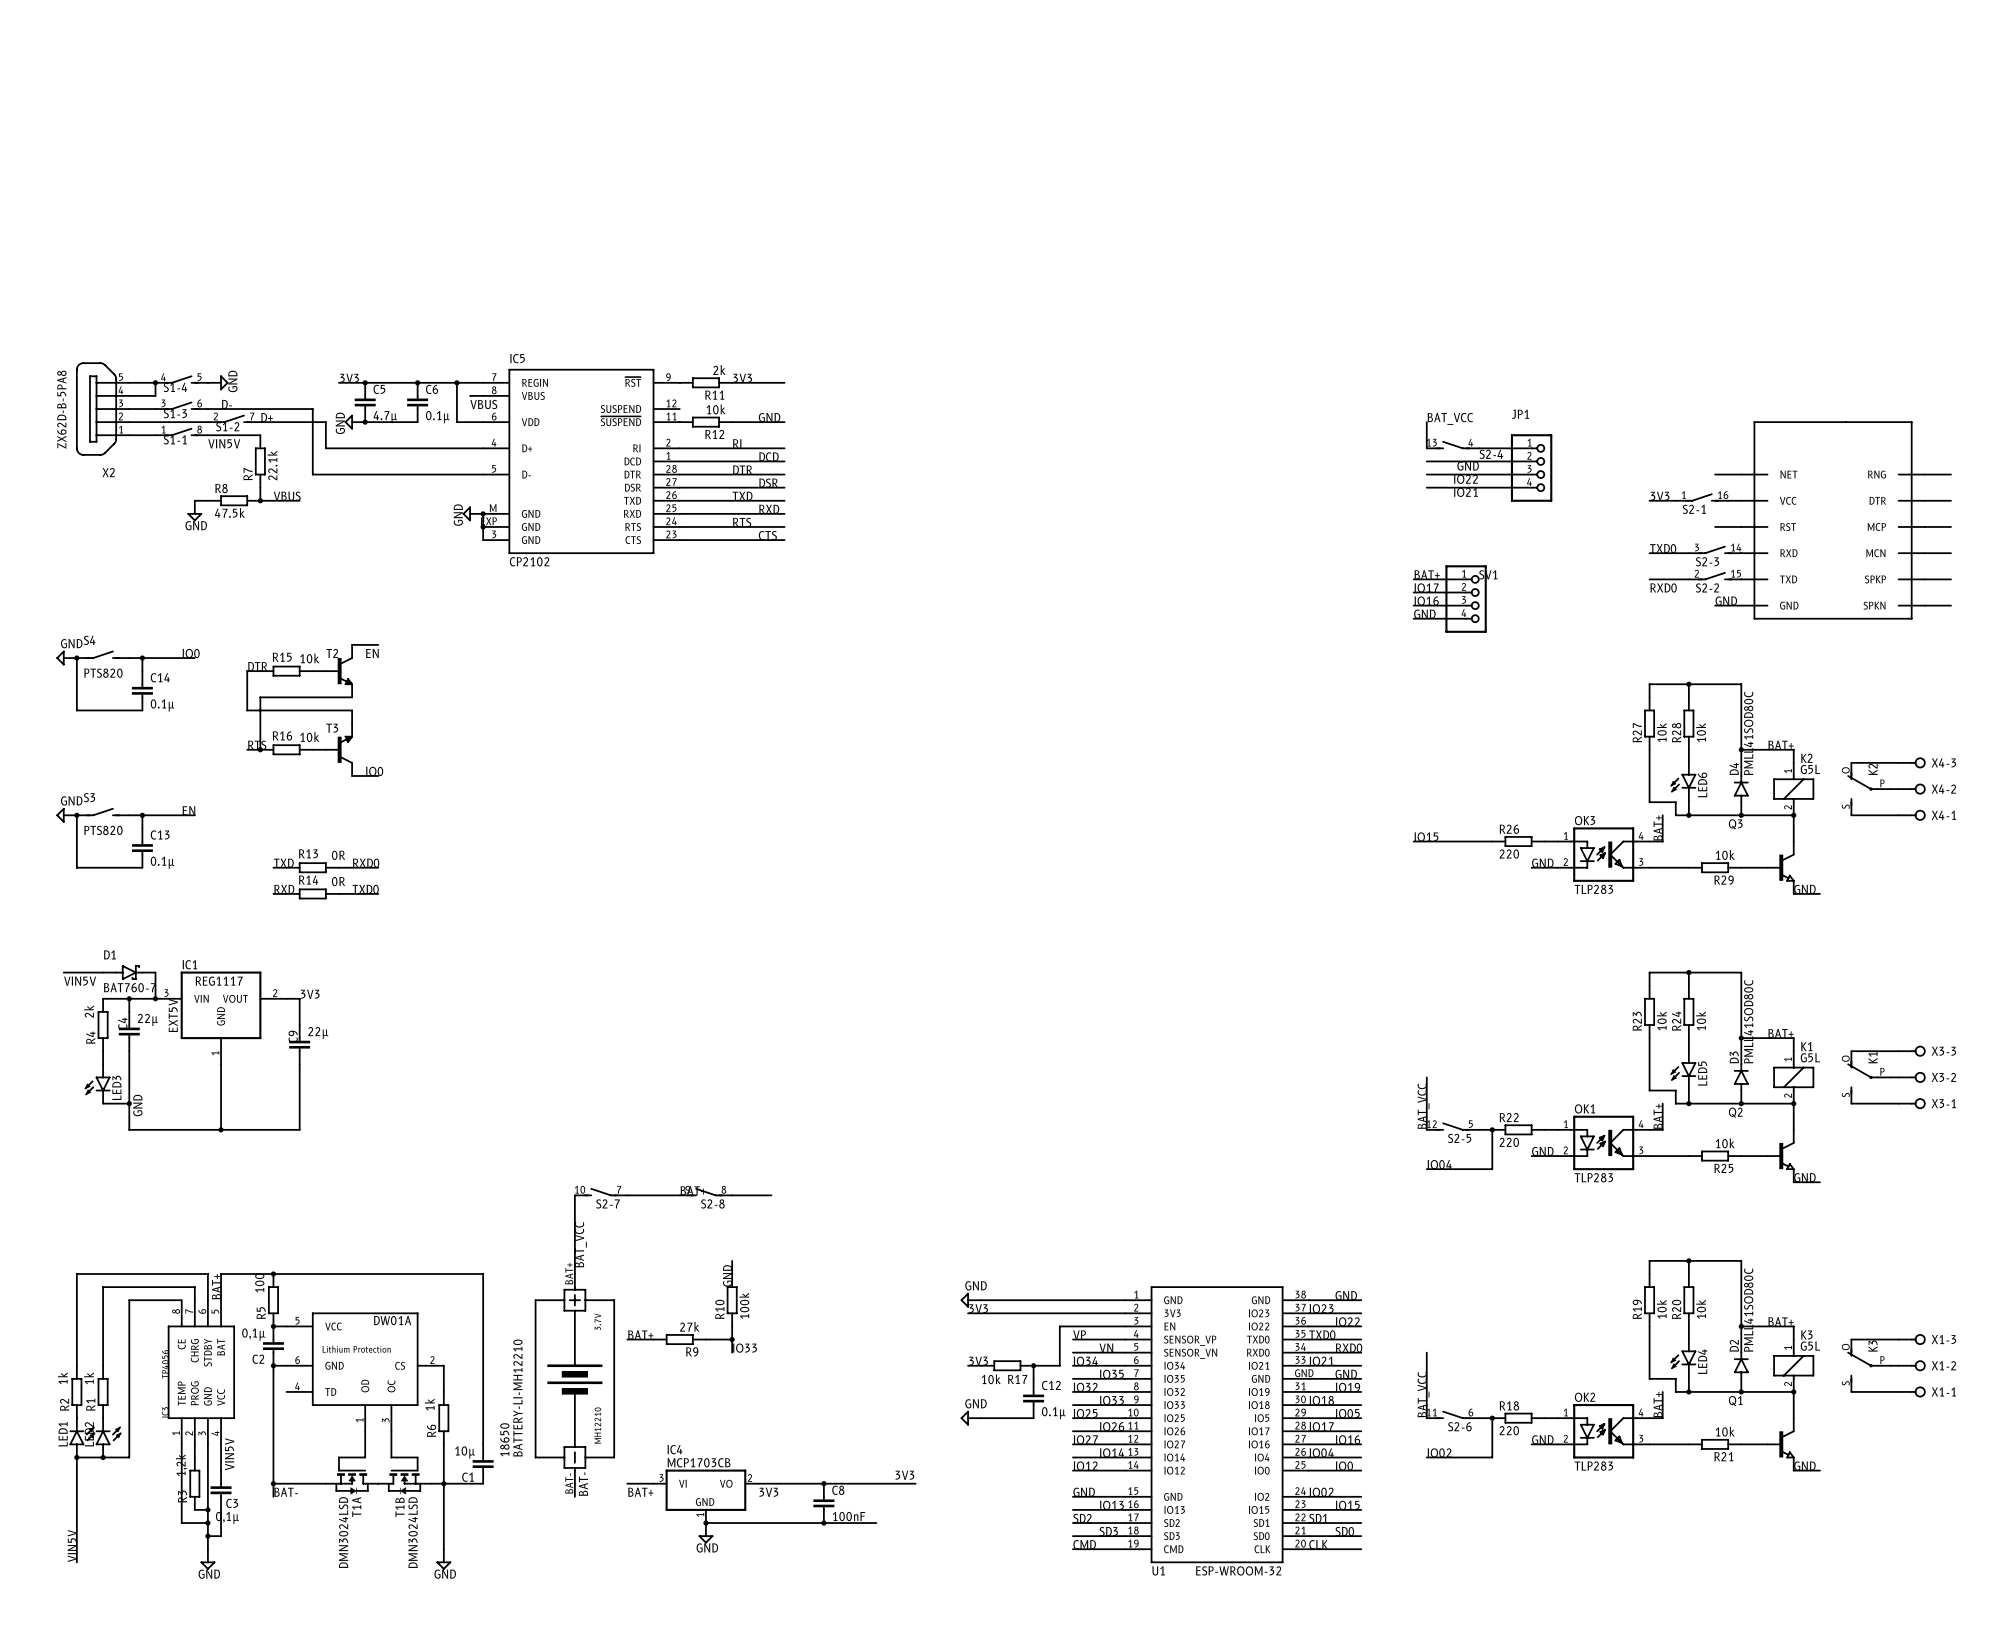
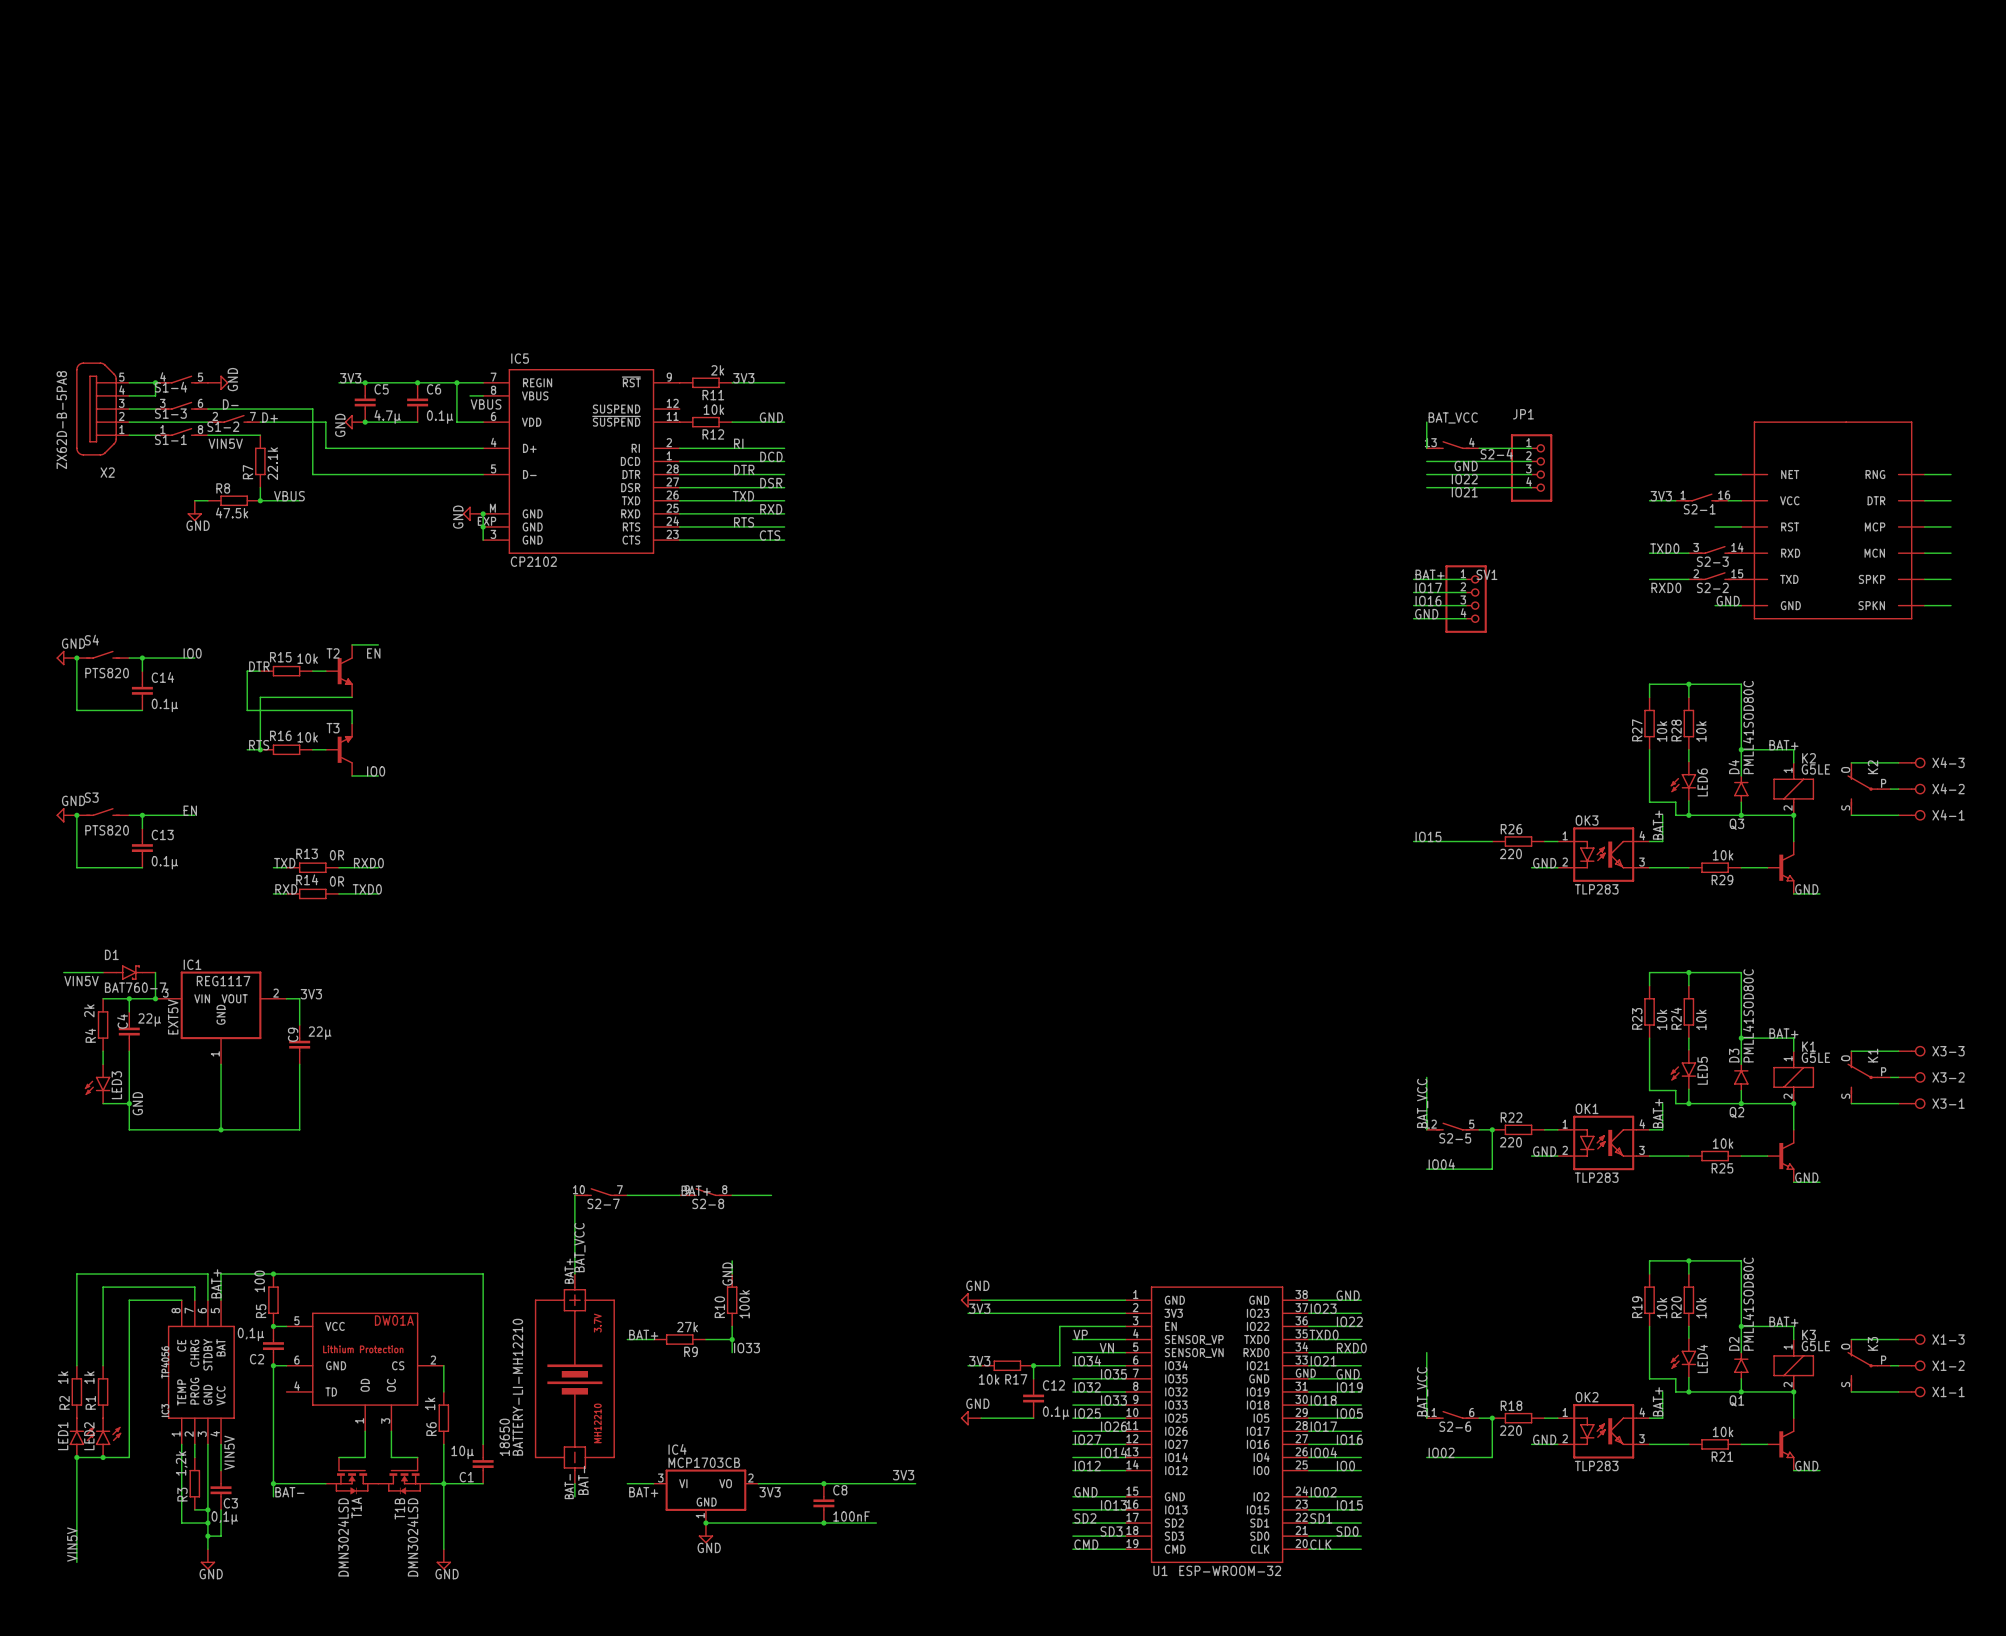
K2 value: G5L (1810, 769) -> G5LE (1815, 769)
K1 value: G5L (1810, 1057) -> G5LE (1815, 1057)
K3 value: G5L (1810, 1346) -> G5LE (1815, 1346)

